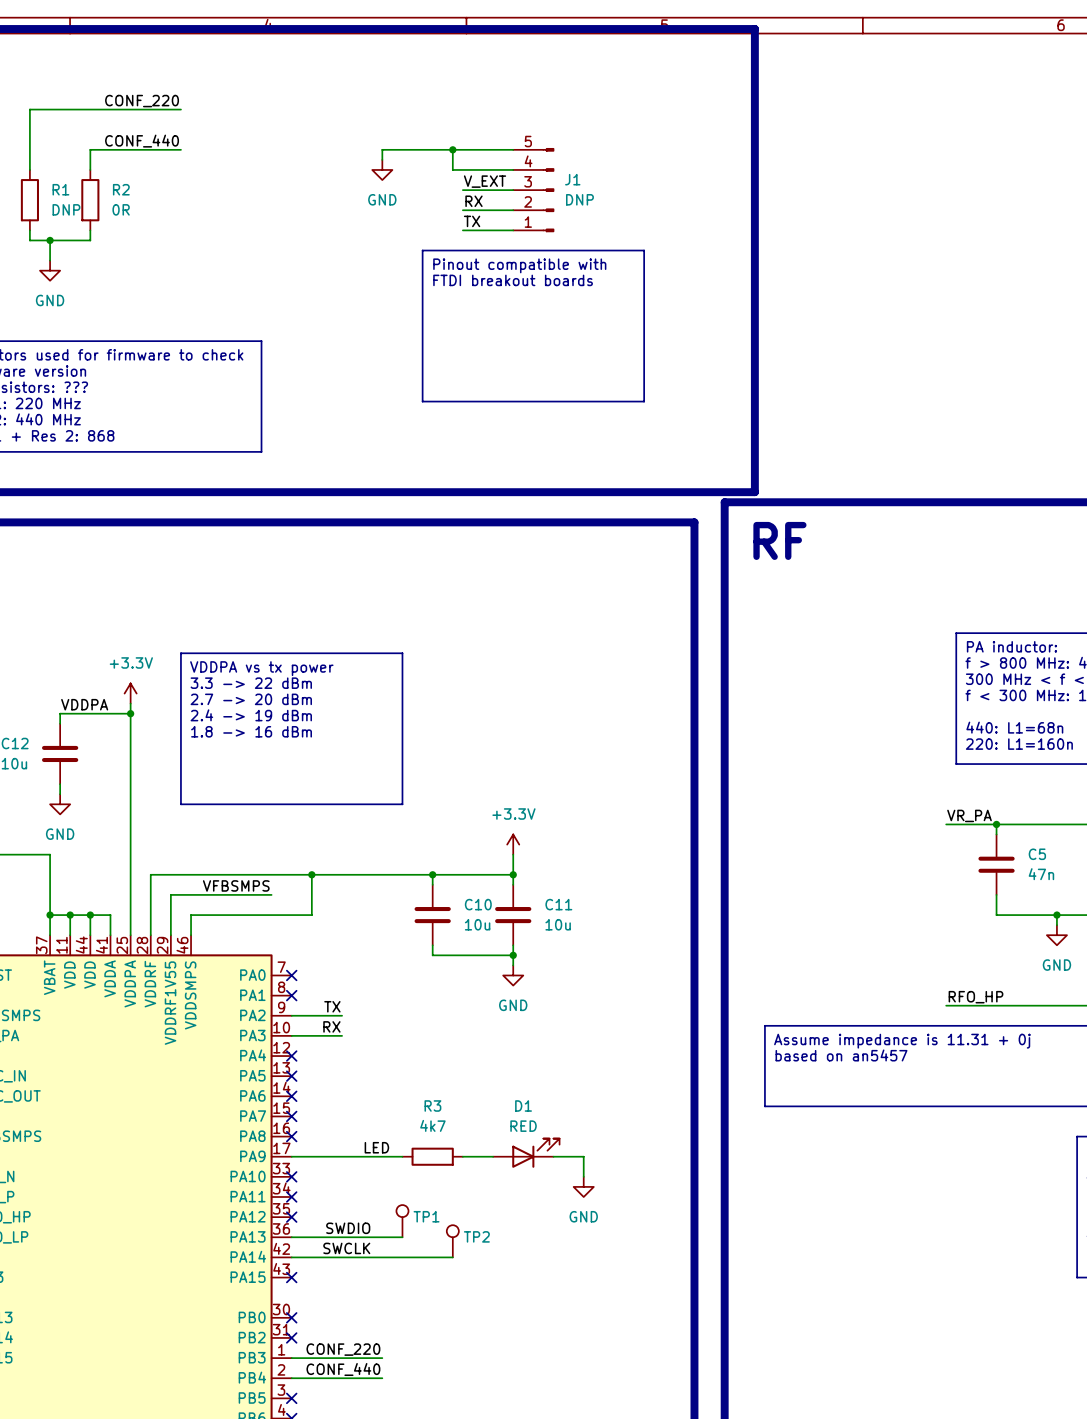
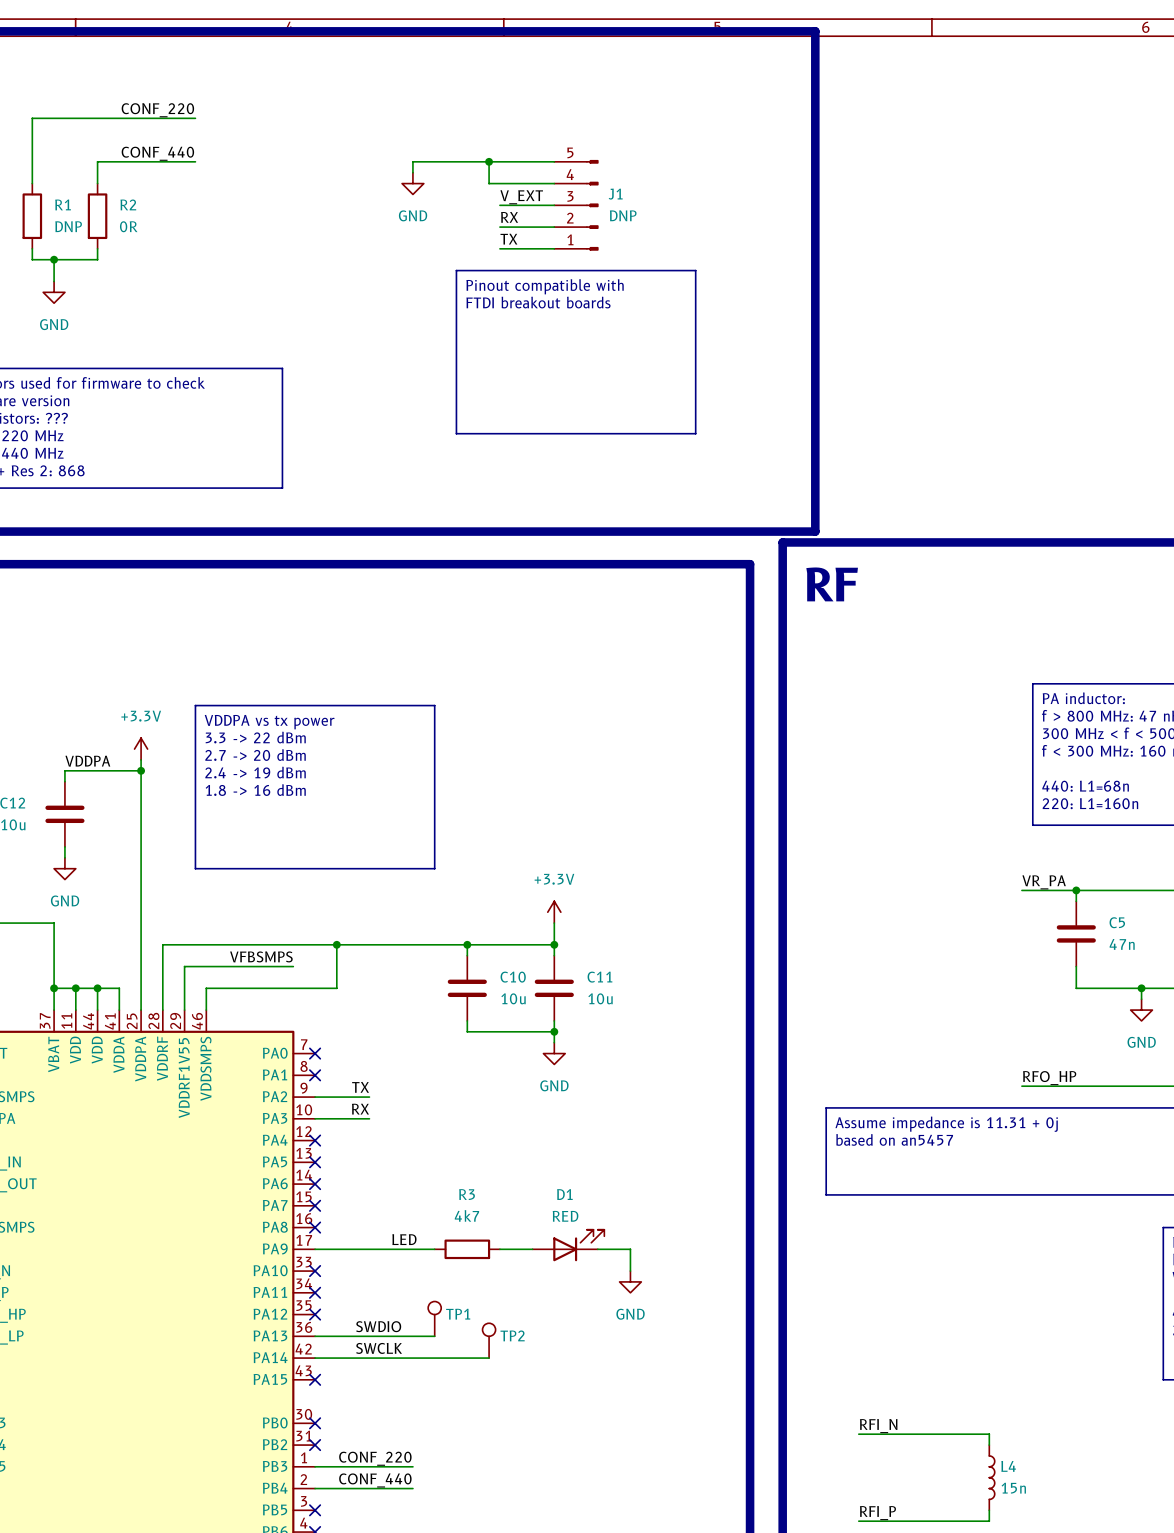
label: none -> RFI_N (878, 1426)
wire: none -> (858, 1434) (989, 1434) (989, 1445)
L4: none -> 15n (992, 1477)
wire: none -> (989, 1510) (989, 1521) (858, 1521)
label: none -> RFI_P (877, 1513)

